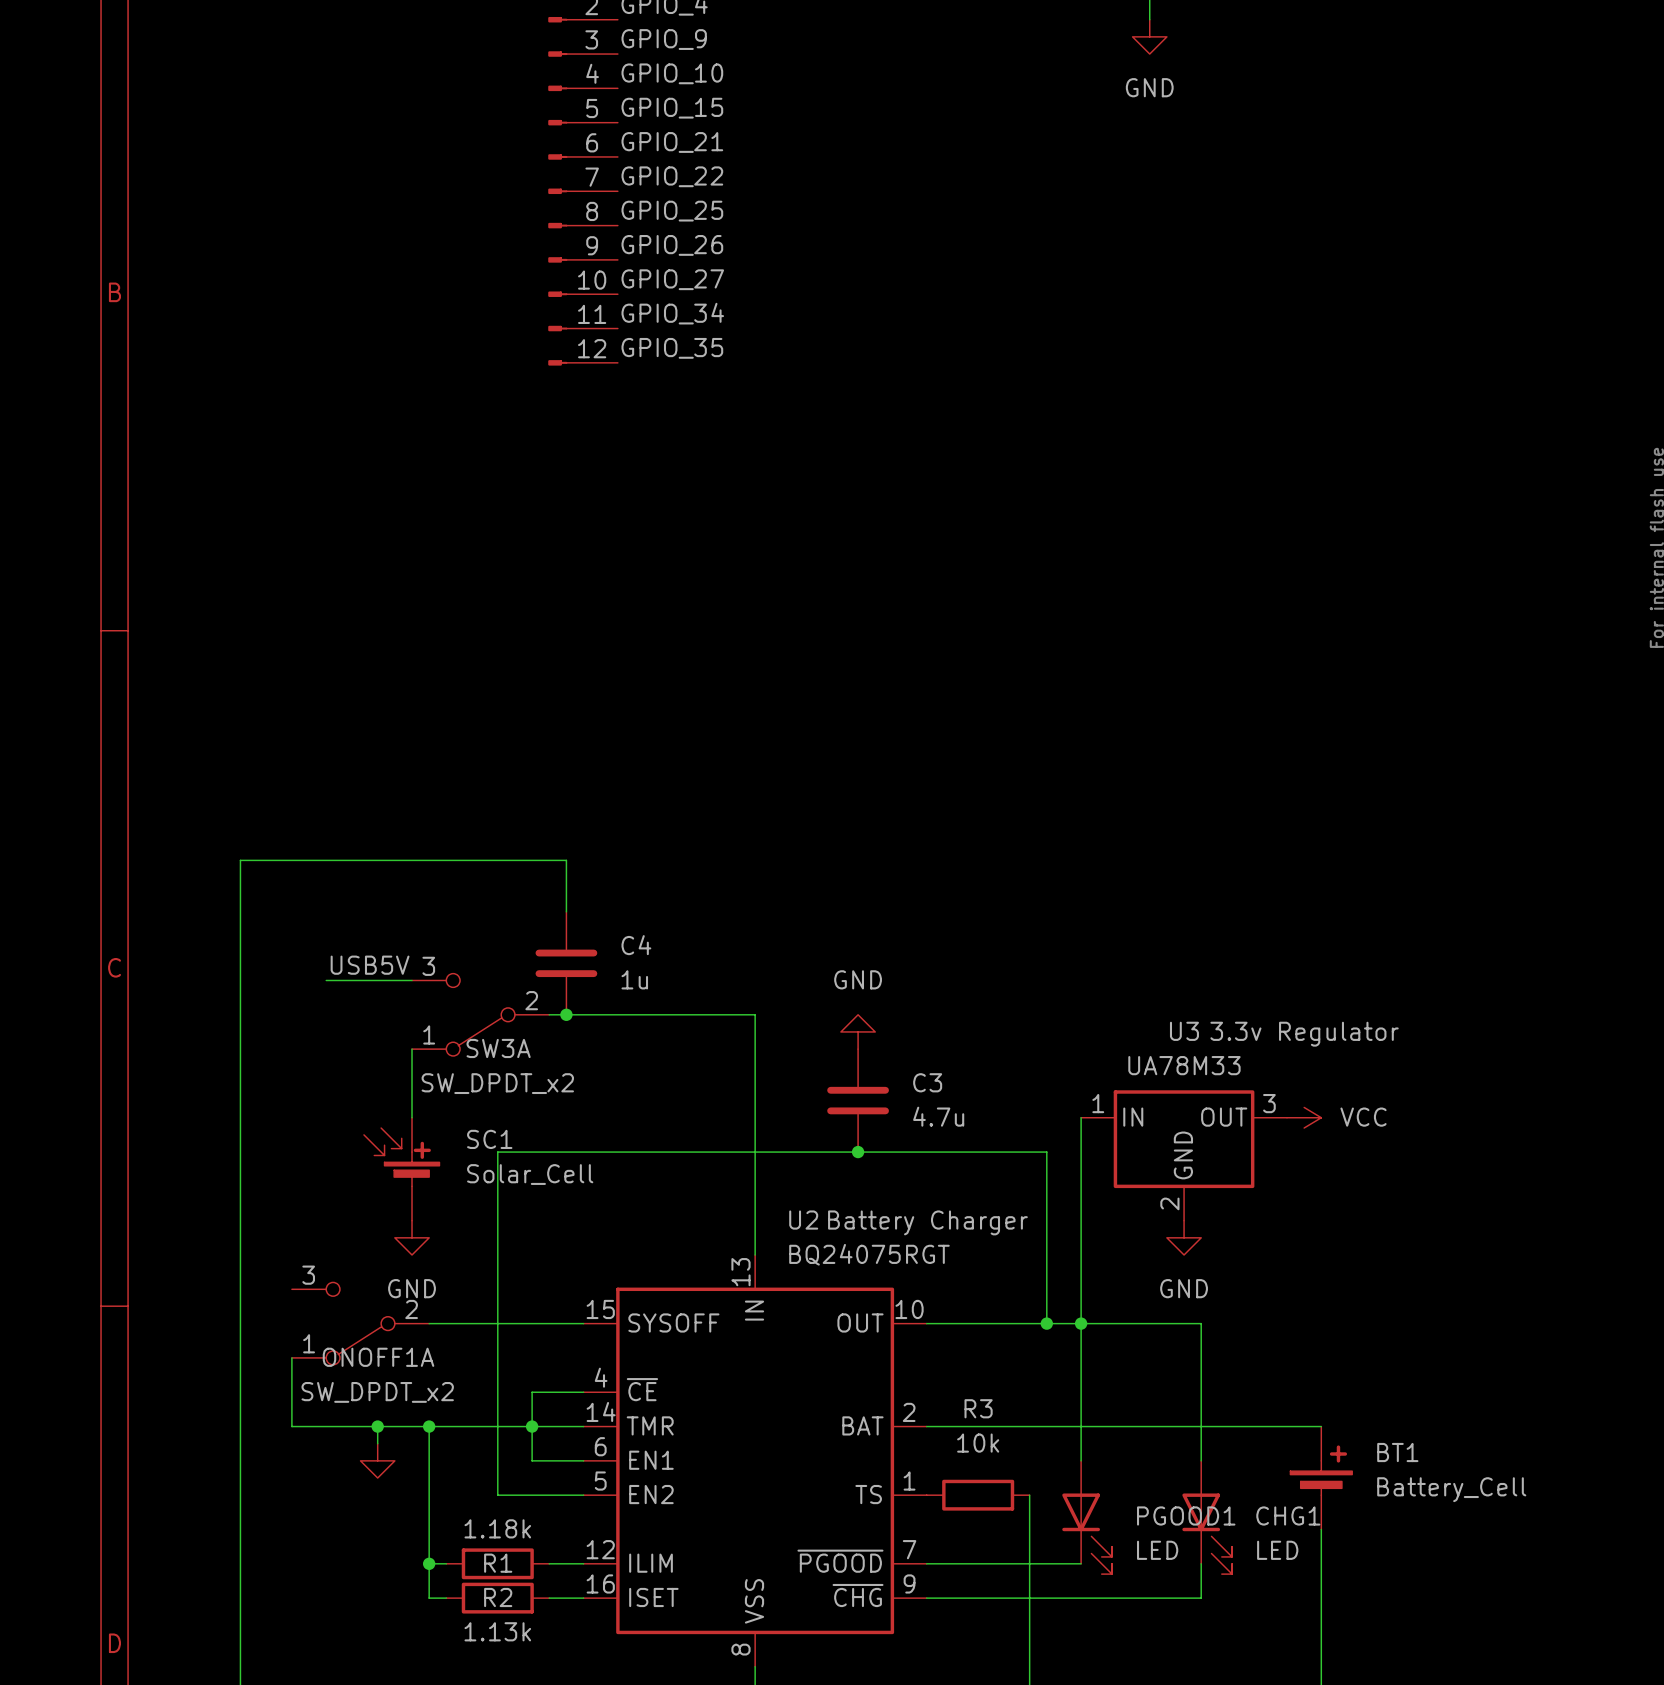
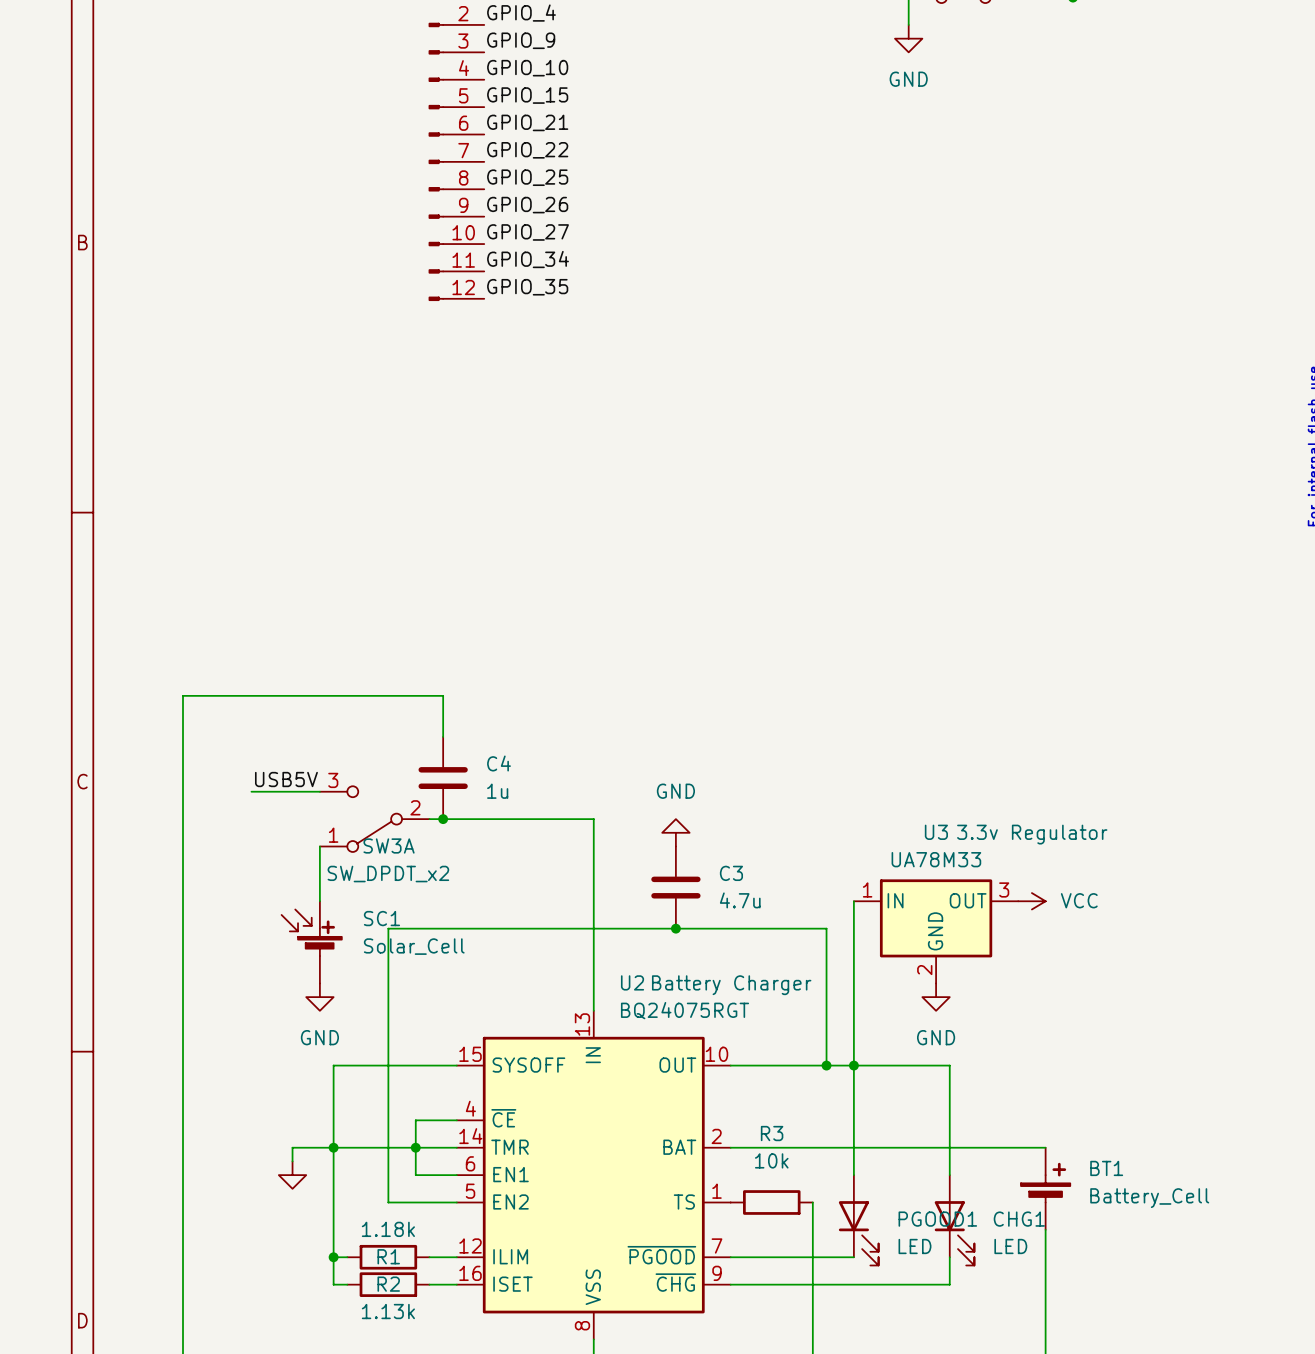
ONOFF1A: SW_DPDT_x2 (360, 1323) -> none
wire: none -> (333, 1065) (333, 1147)
wire: (291, 1357) (291, 1426) (377, 1426) -> none
junction: (377, 1426) -> none

